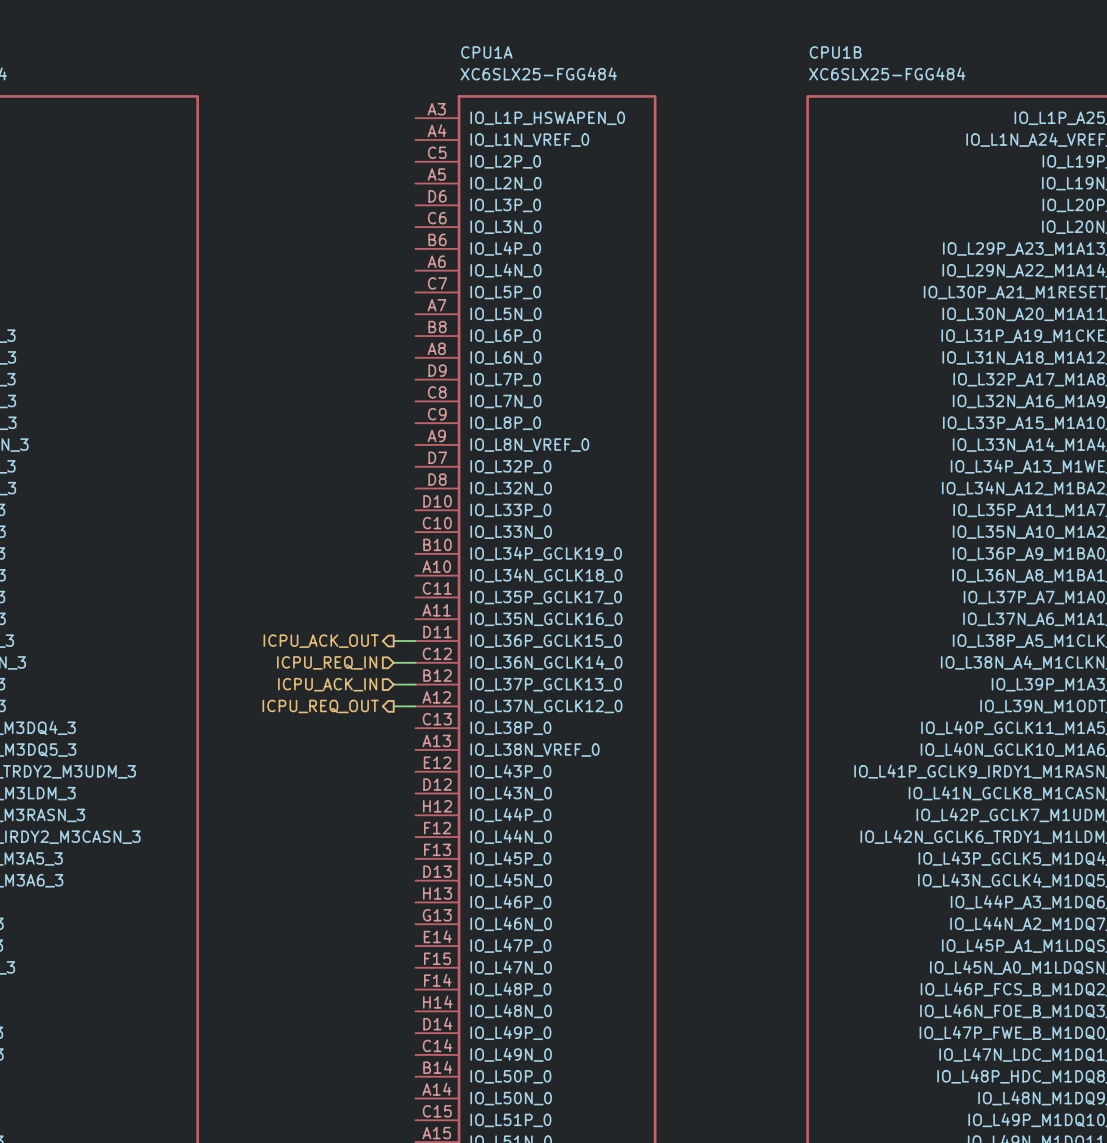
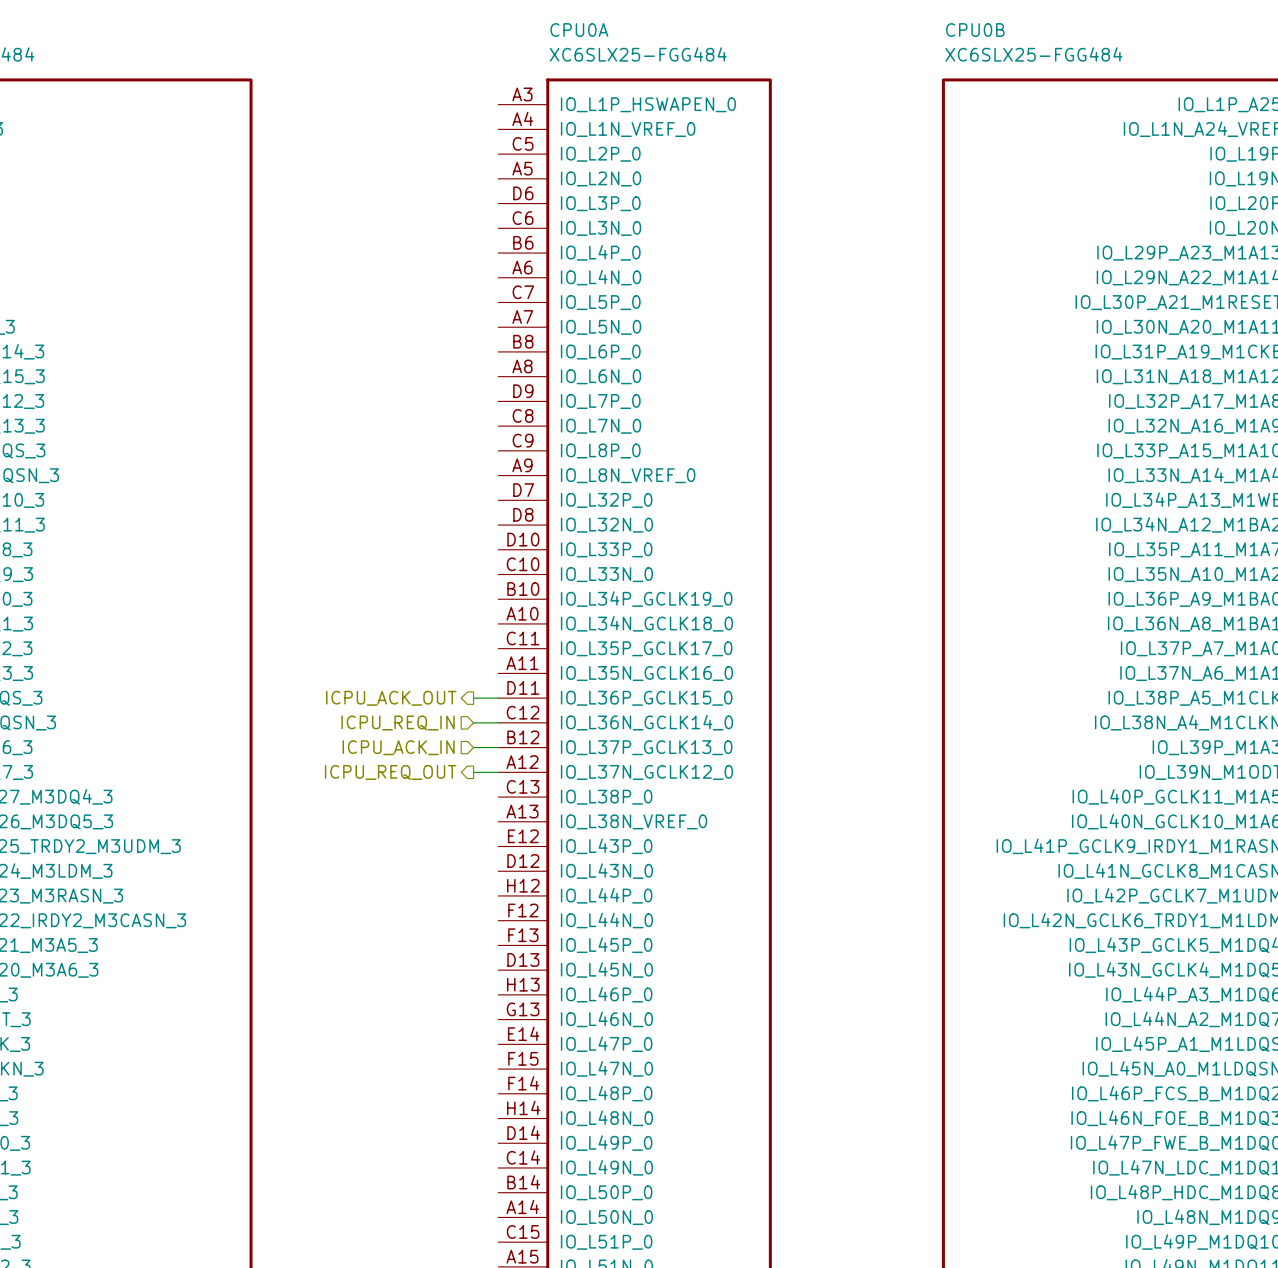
CPU1A name: CPU1A (486, 52) -> CPU0A (579, 30)
CPU1B name: CPU1B (835, 52) -> CPU0B (975, 30)

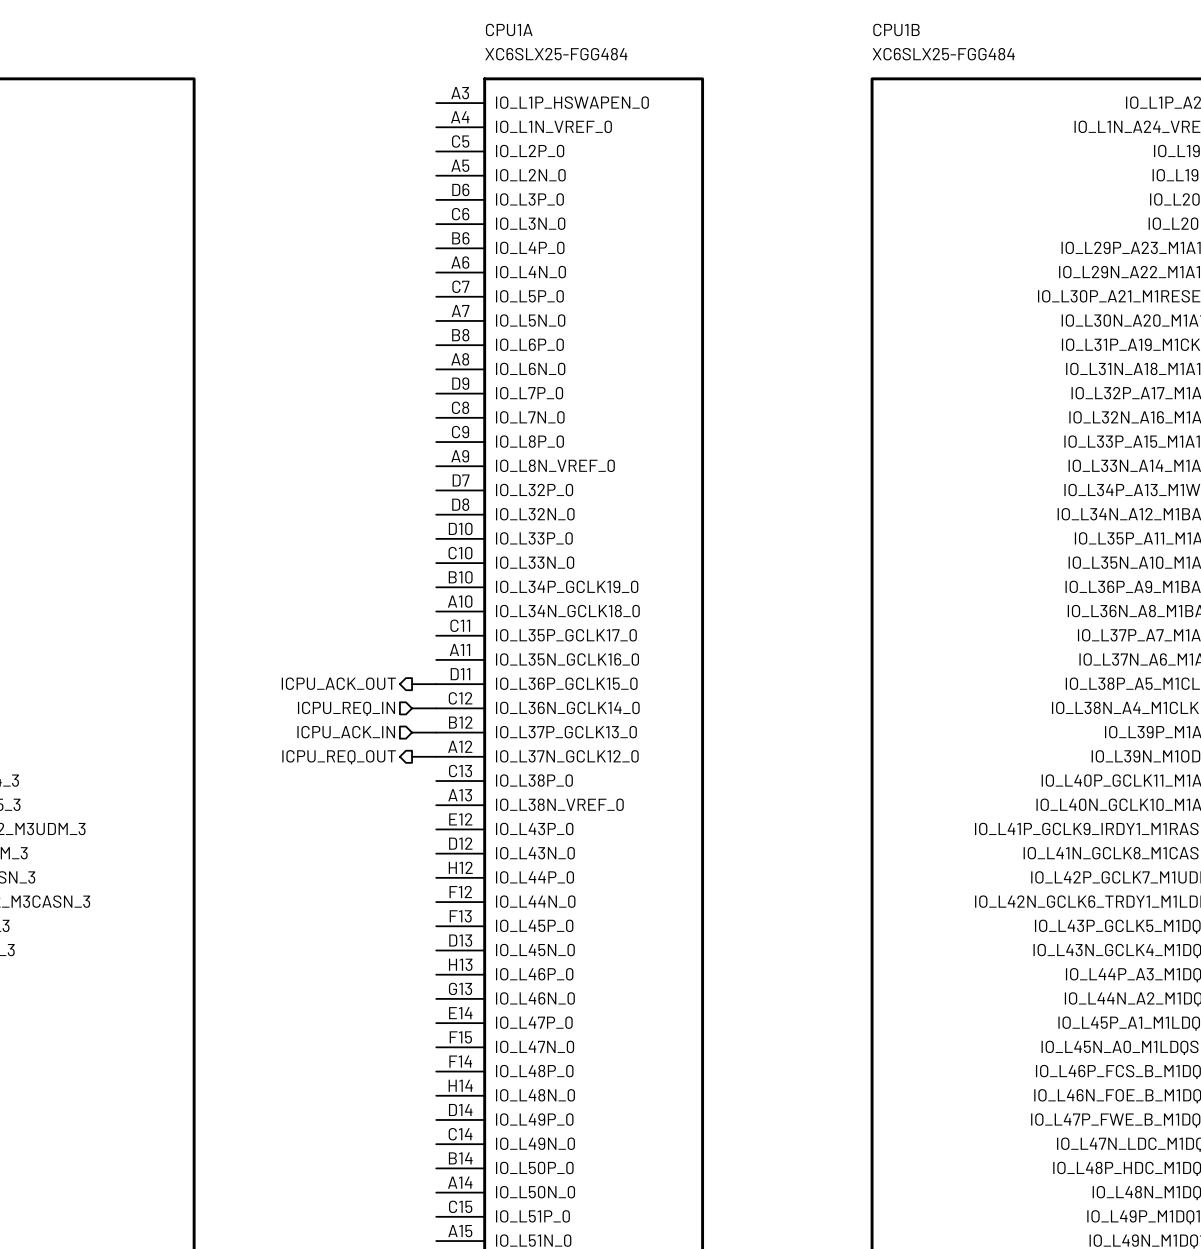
CPU0A name: CPU0A (579, 30) -> CPU1A (509, 29)
CPU0B name: CPU0B (975, 30) -> CPU1B (896, 29)

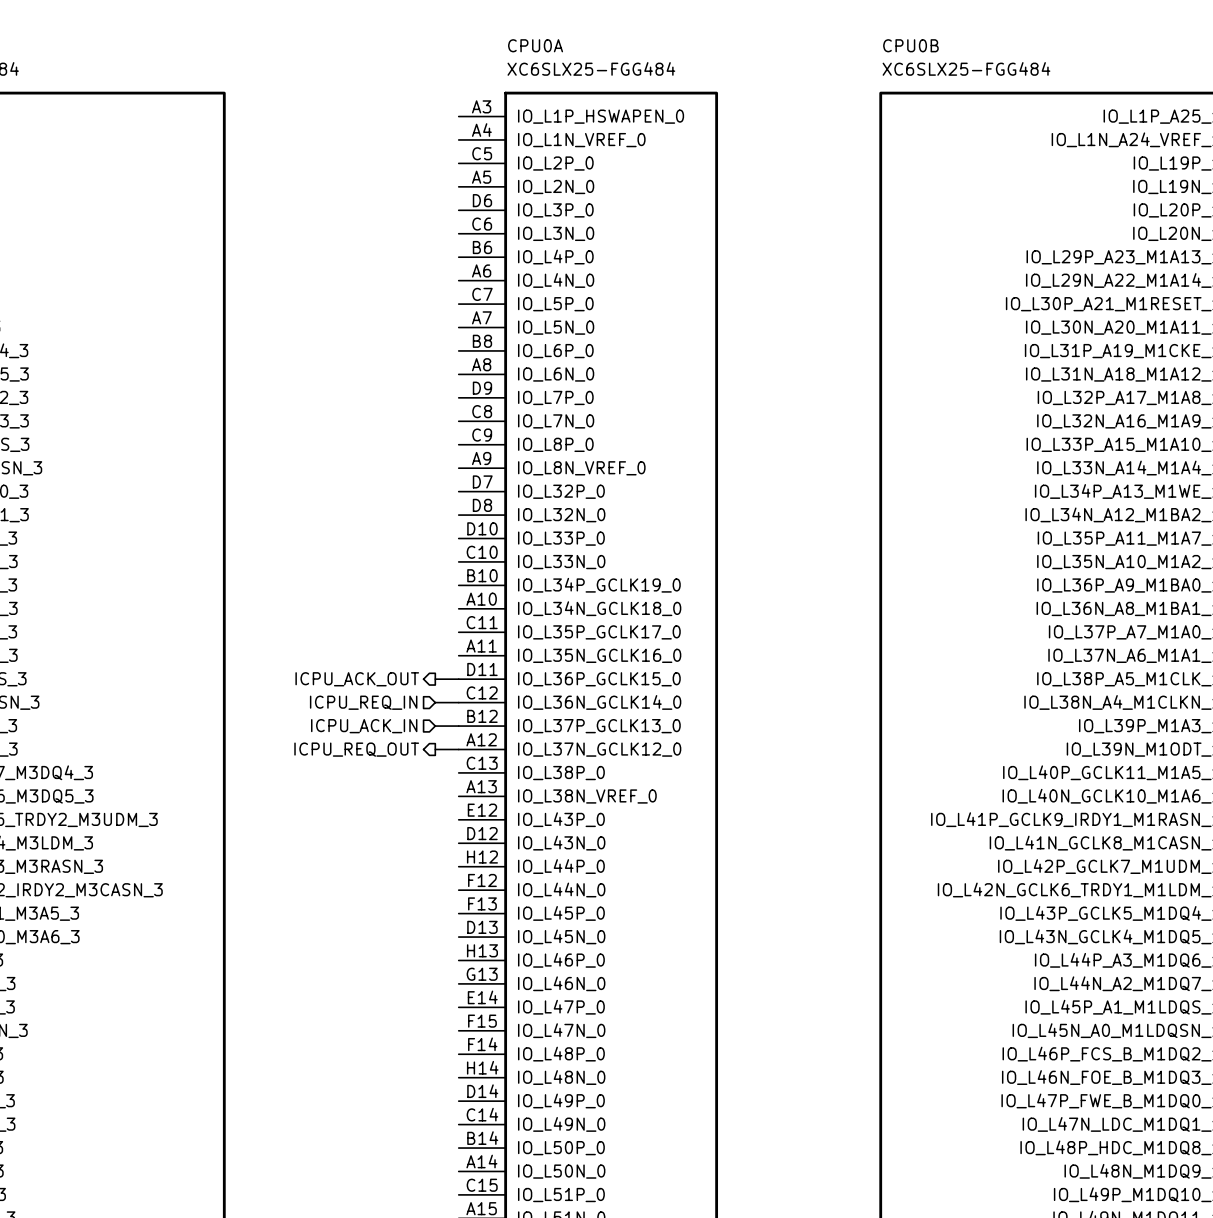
CPU1A name: CPU1A (509, 29) -> CPU0A (535, 45)
CPU1B name: CPU1B (896, 29) -> CPU0B (910, 45)

